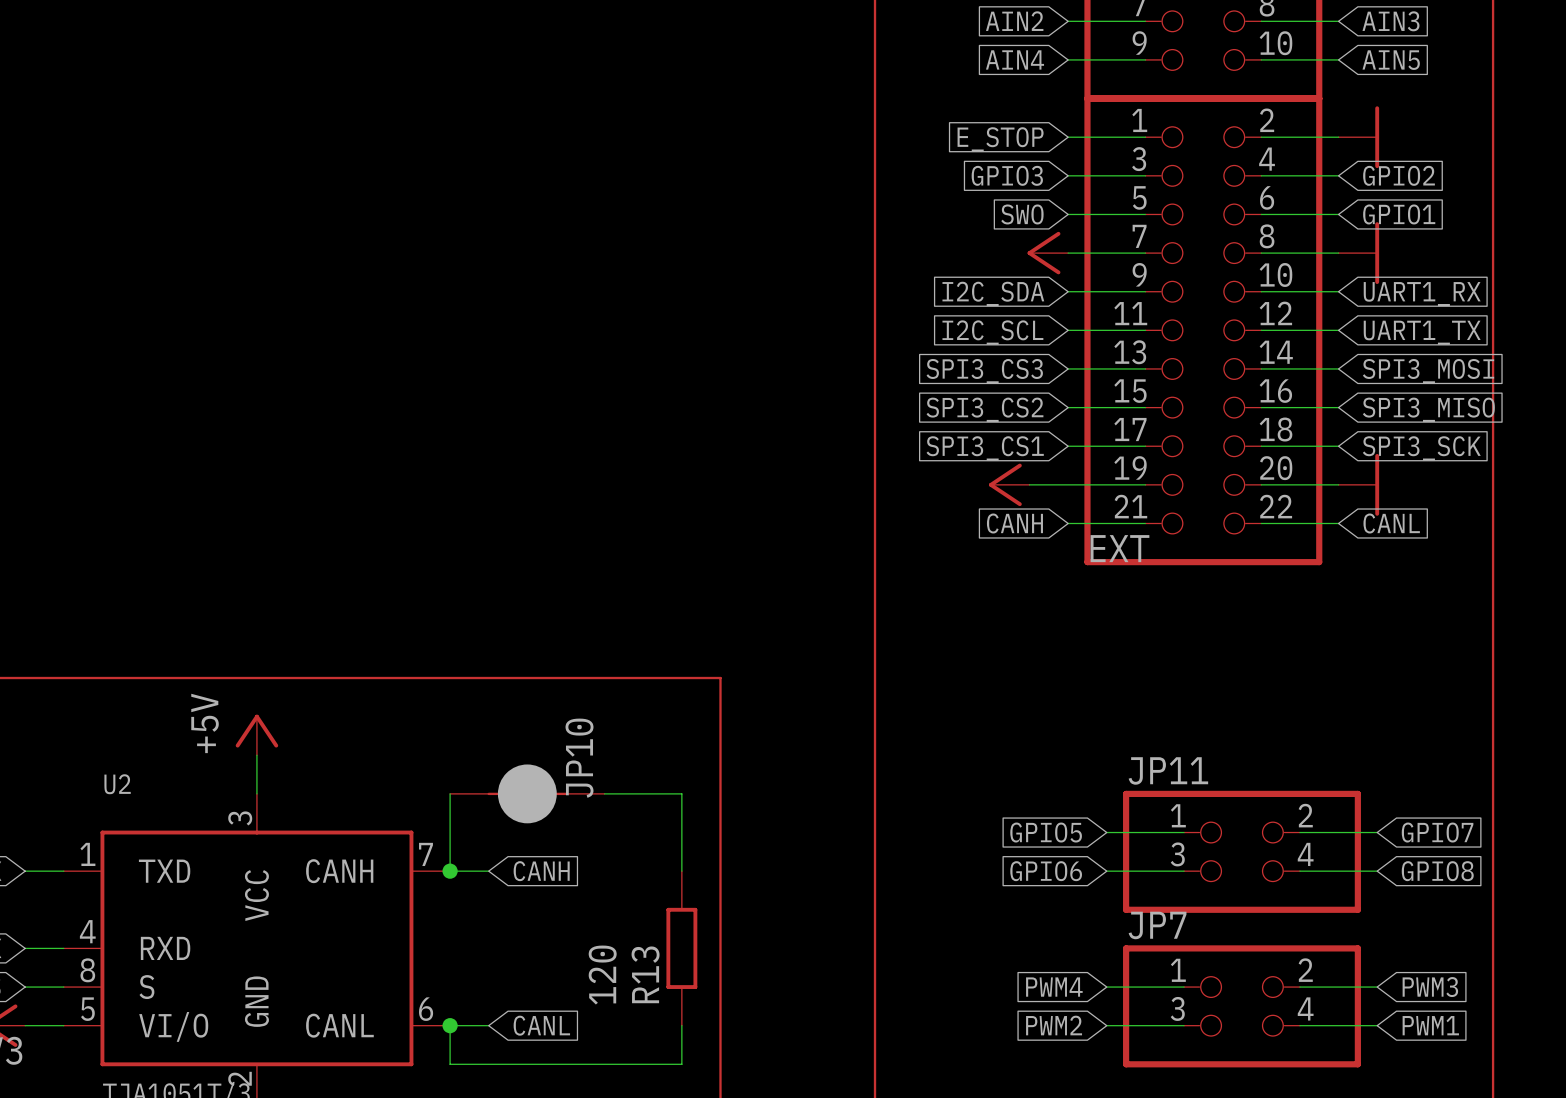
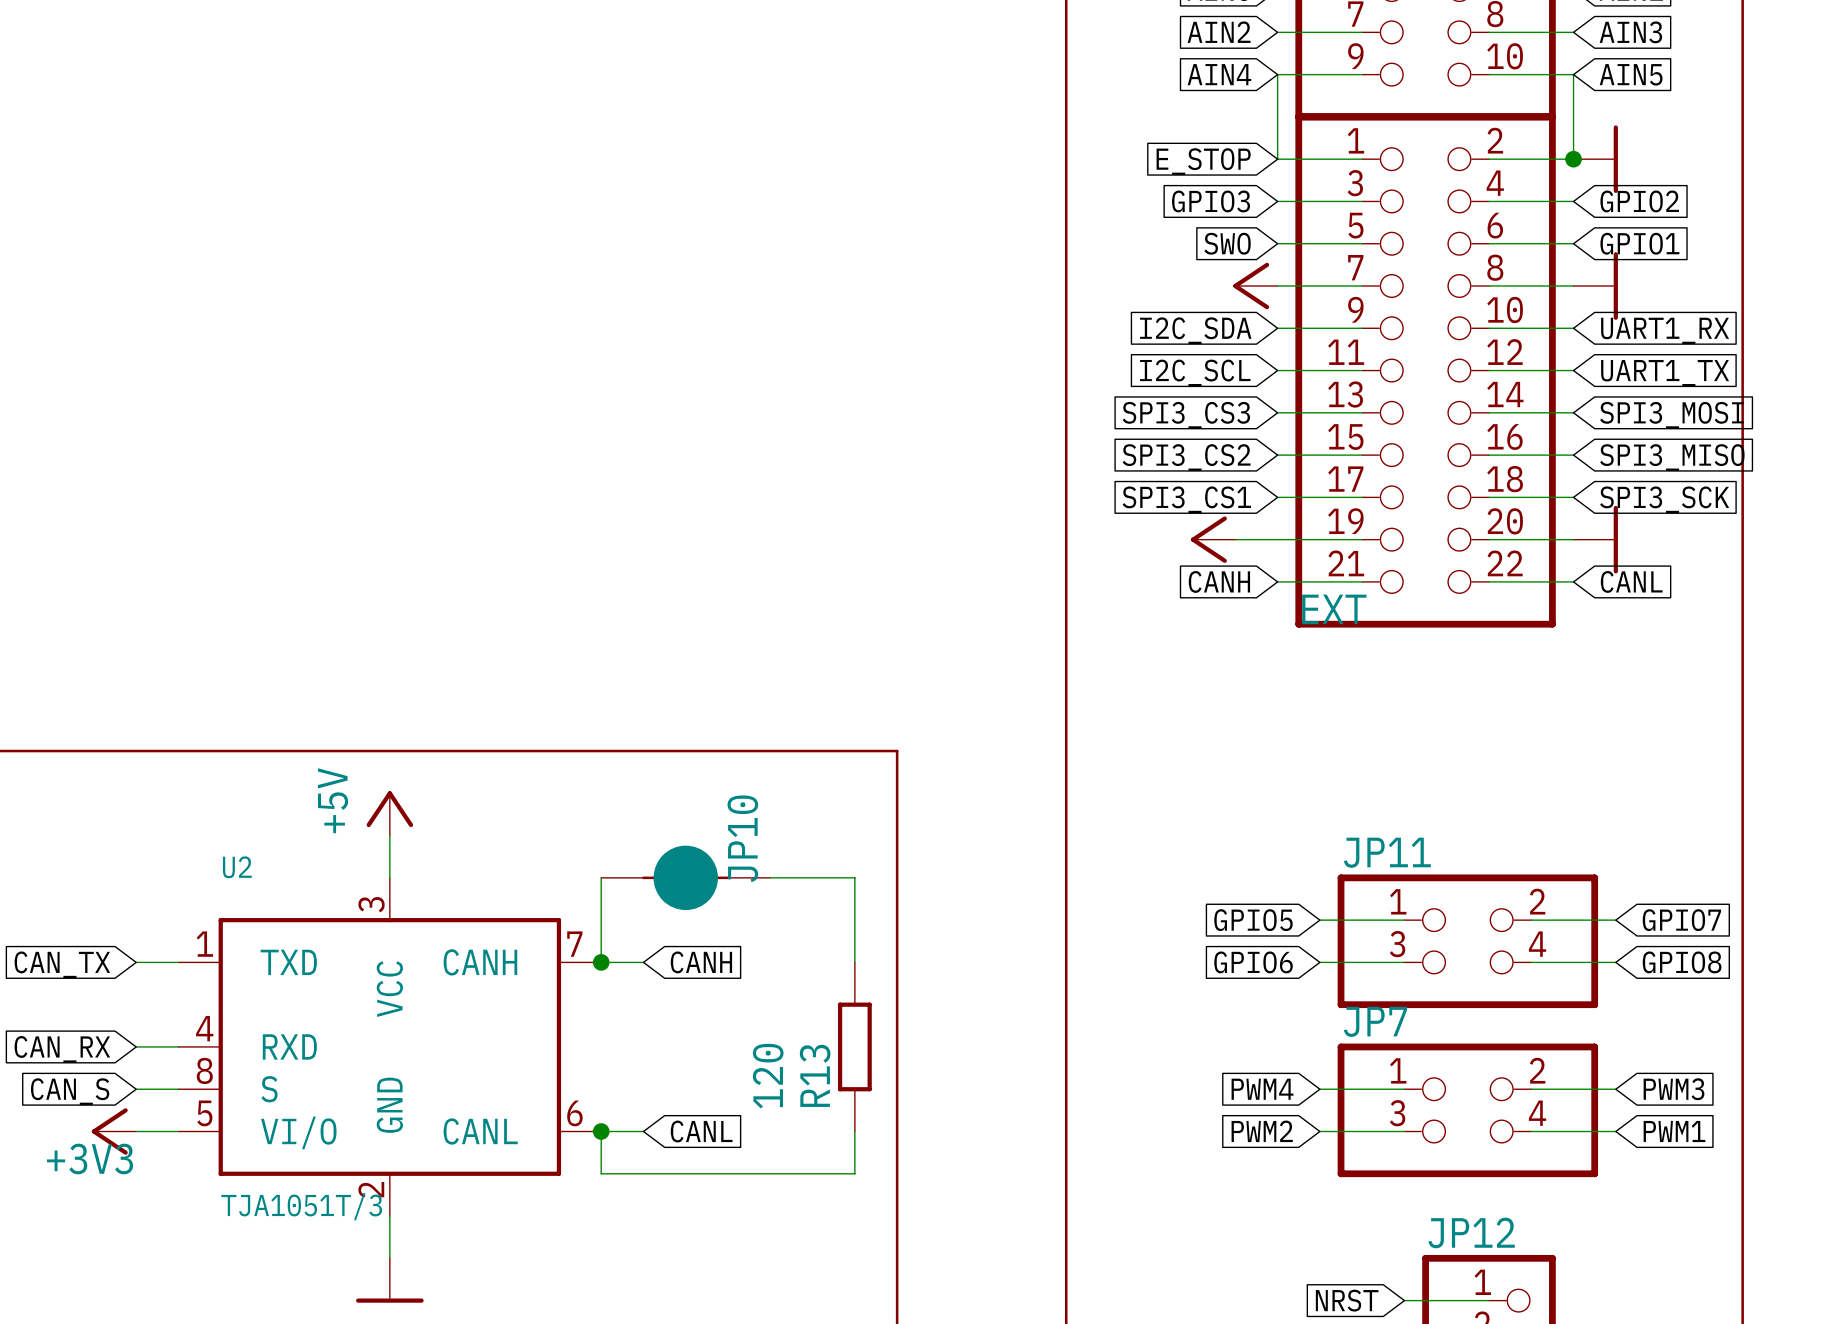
wire: none -> (1277, 74) (1277, 159)
wire: none -> (1573, 74) (1573, 159)
junction: none -> (1573, 159)

